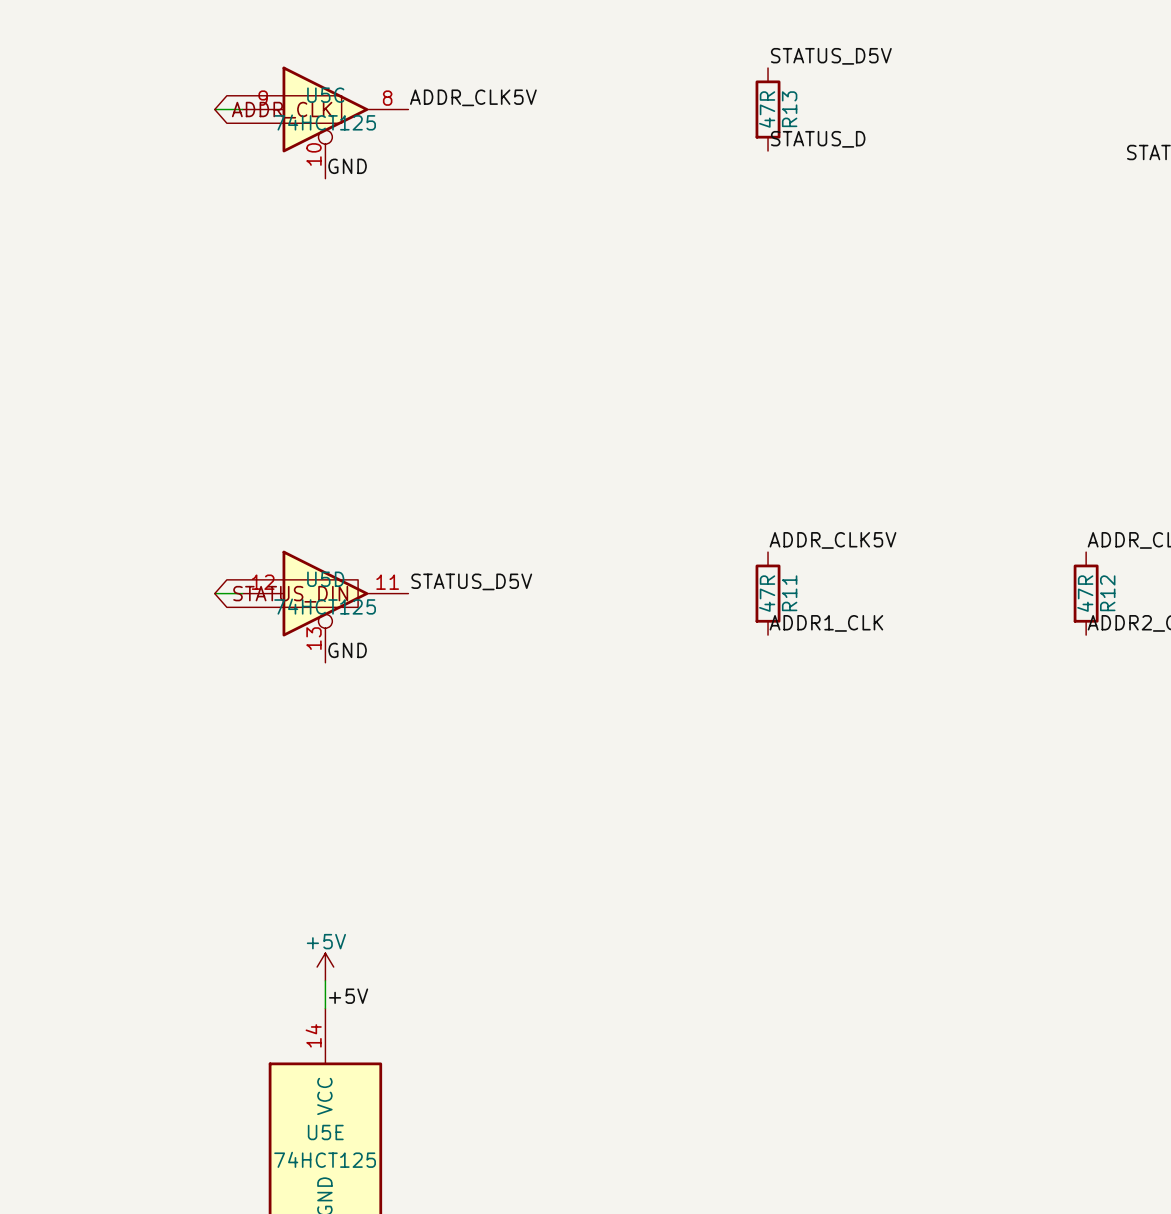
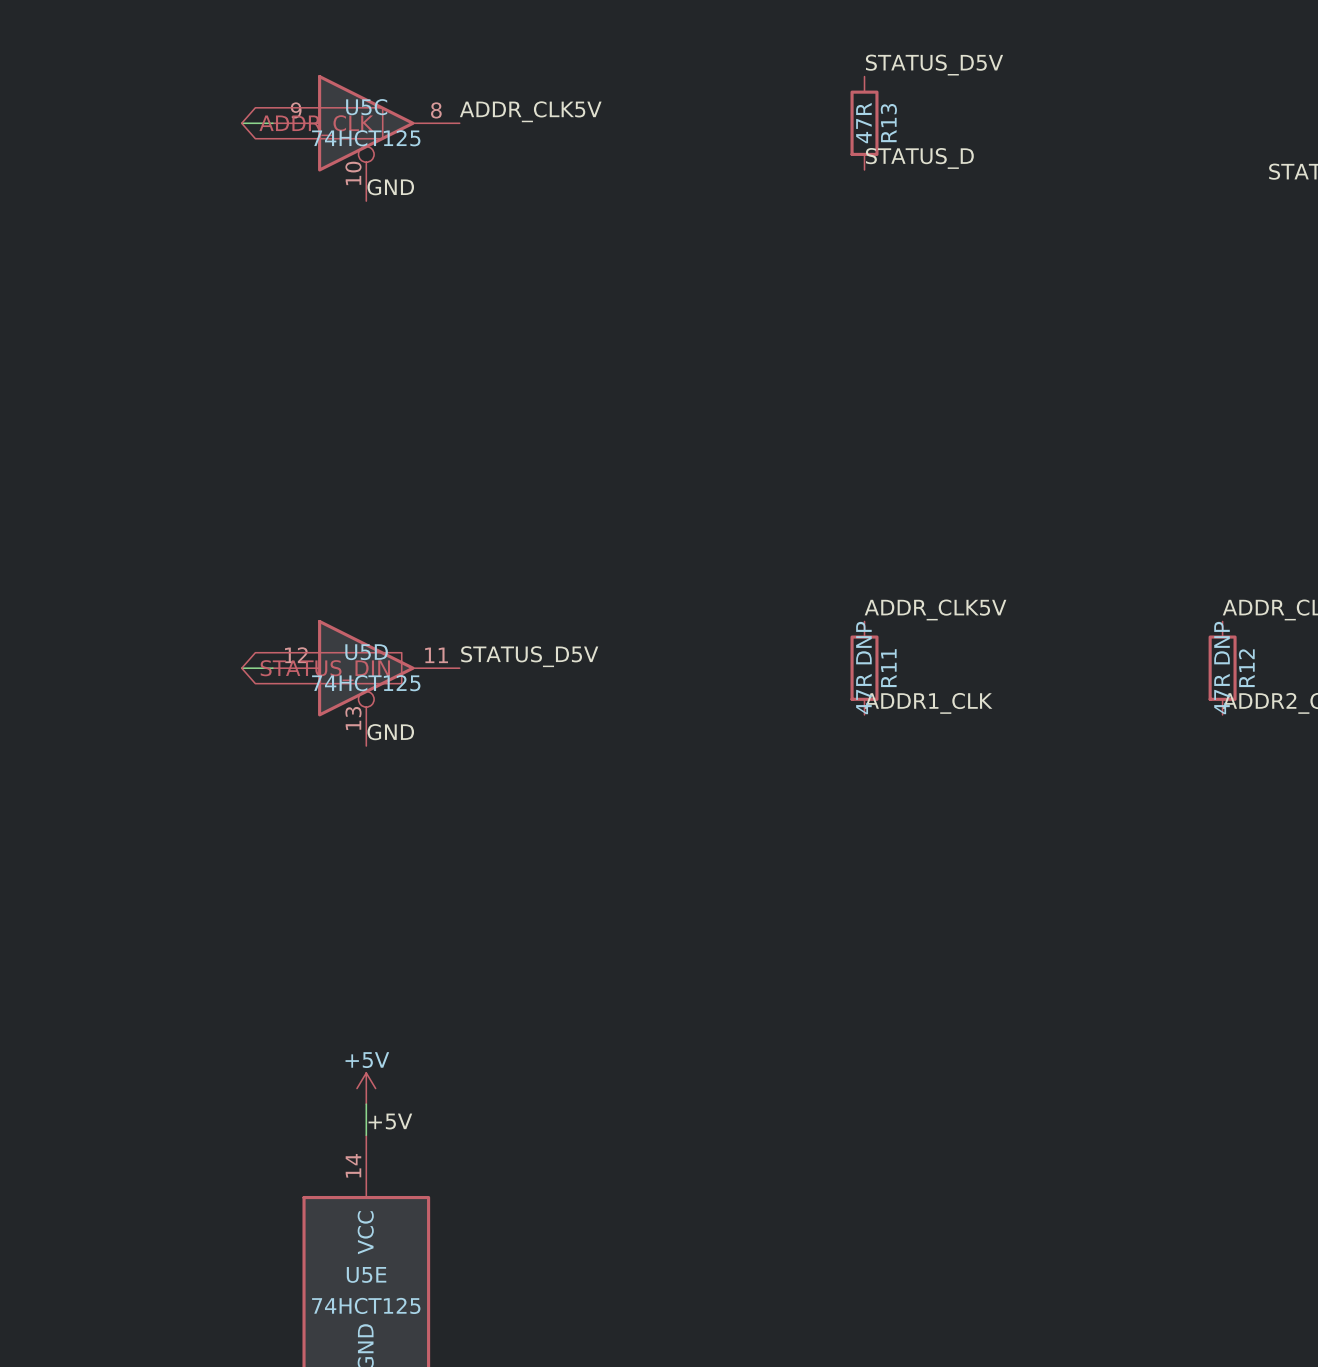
R11 value: 47R (767, 593) -> 47R DNP (863, 668)
R12 value: 47R (1085, 593) -> 47R DNP (1222, 668)

